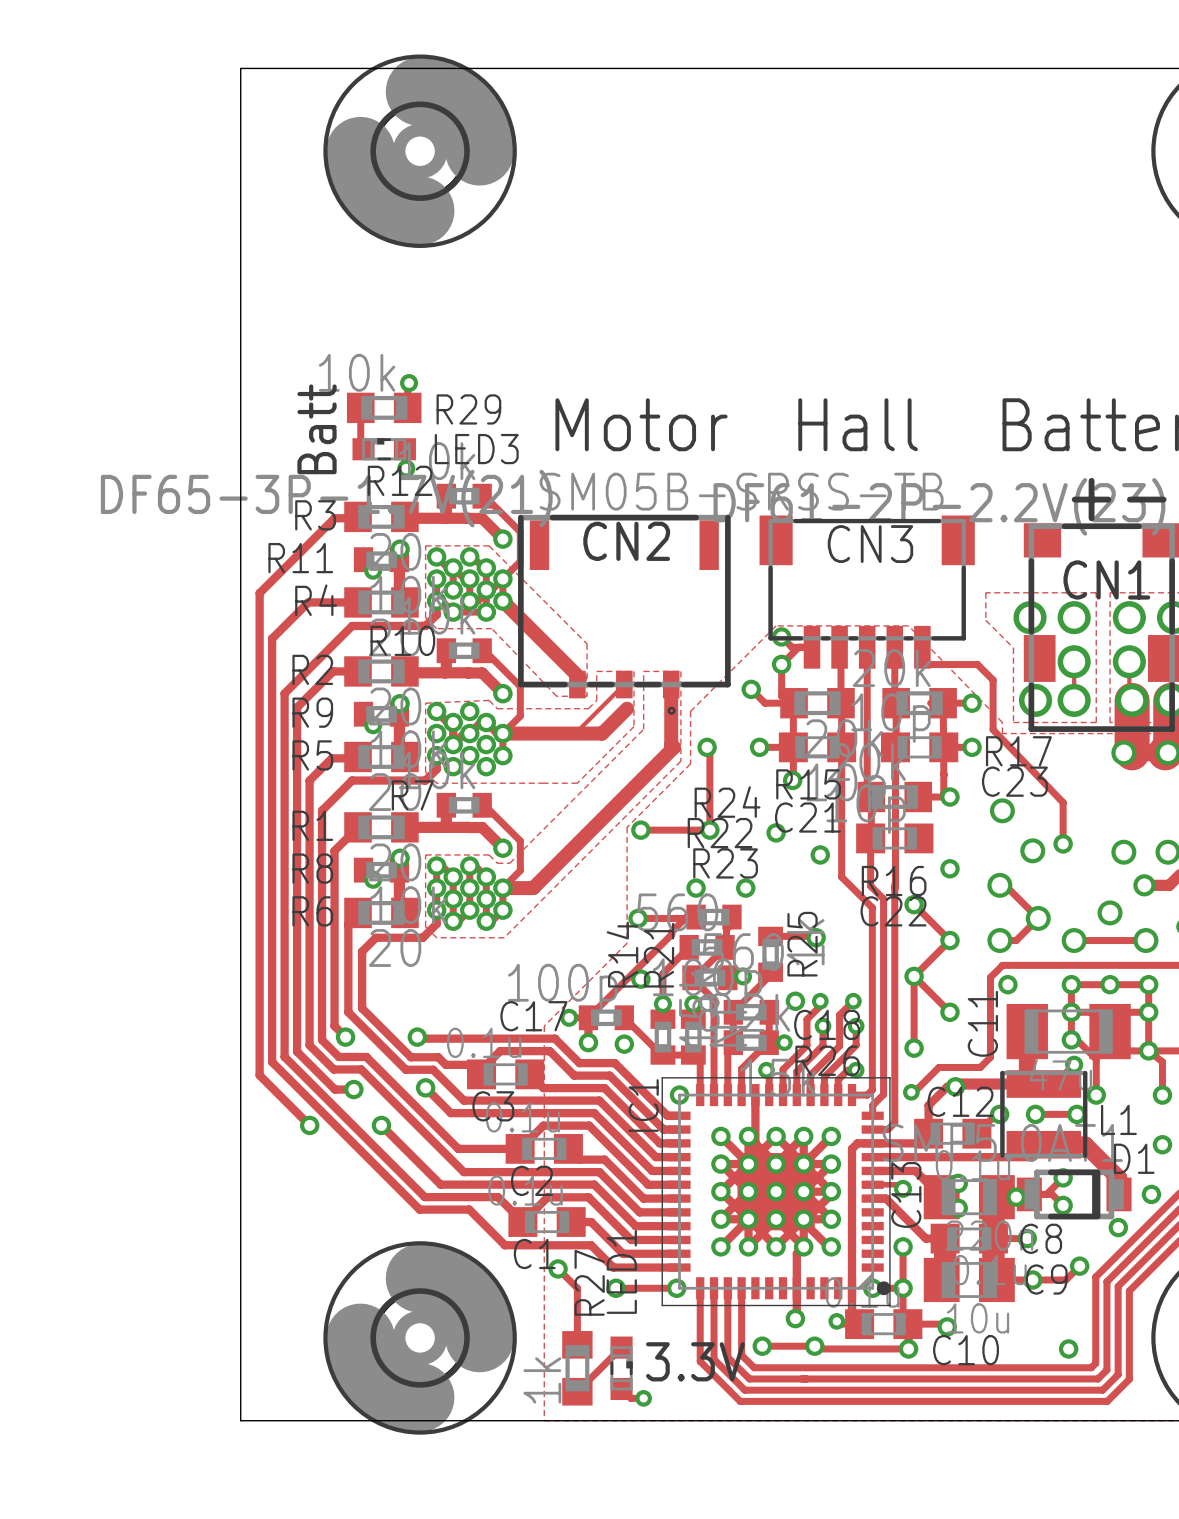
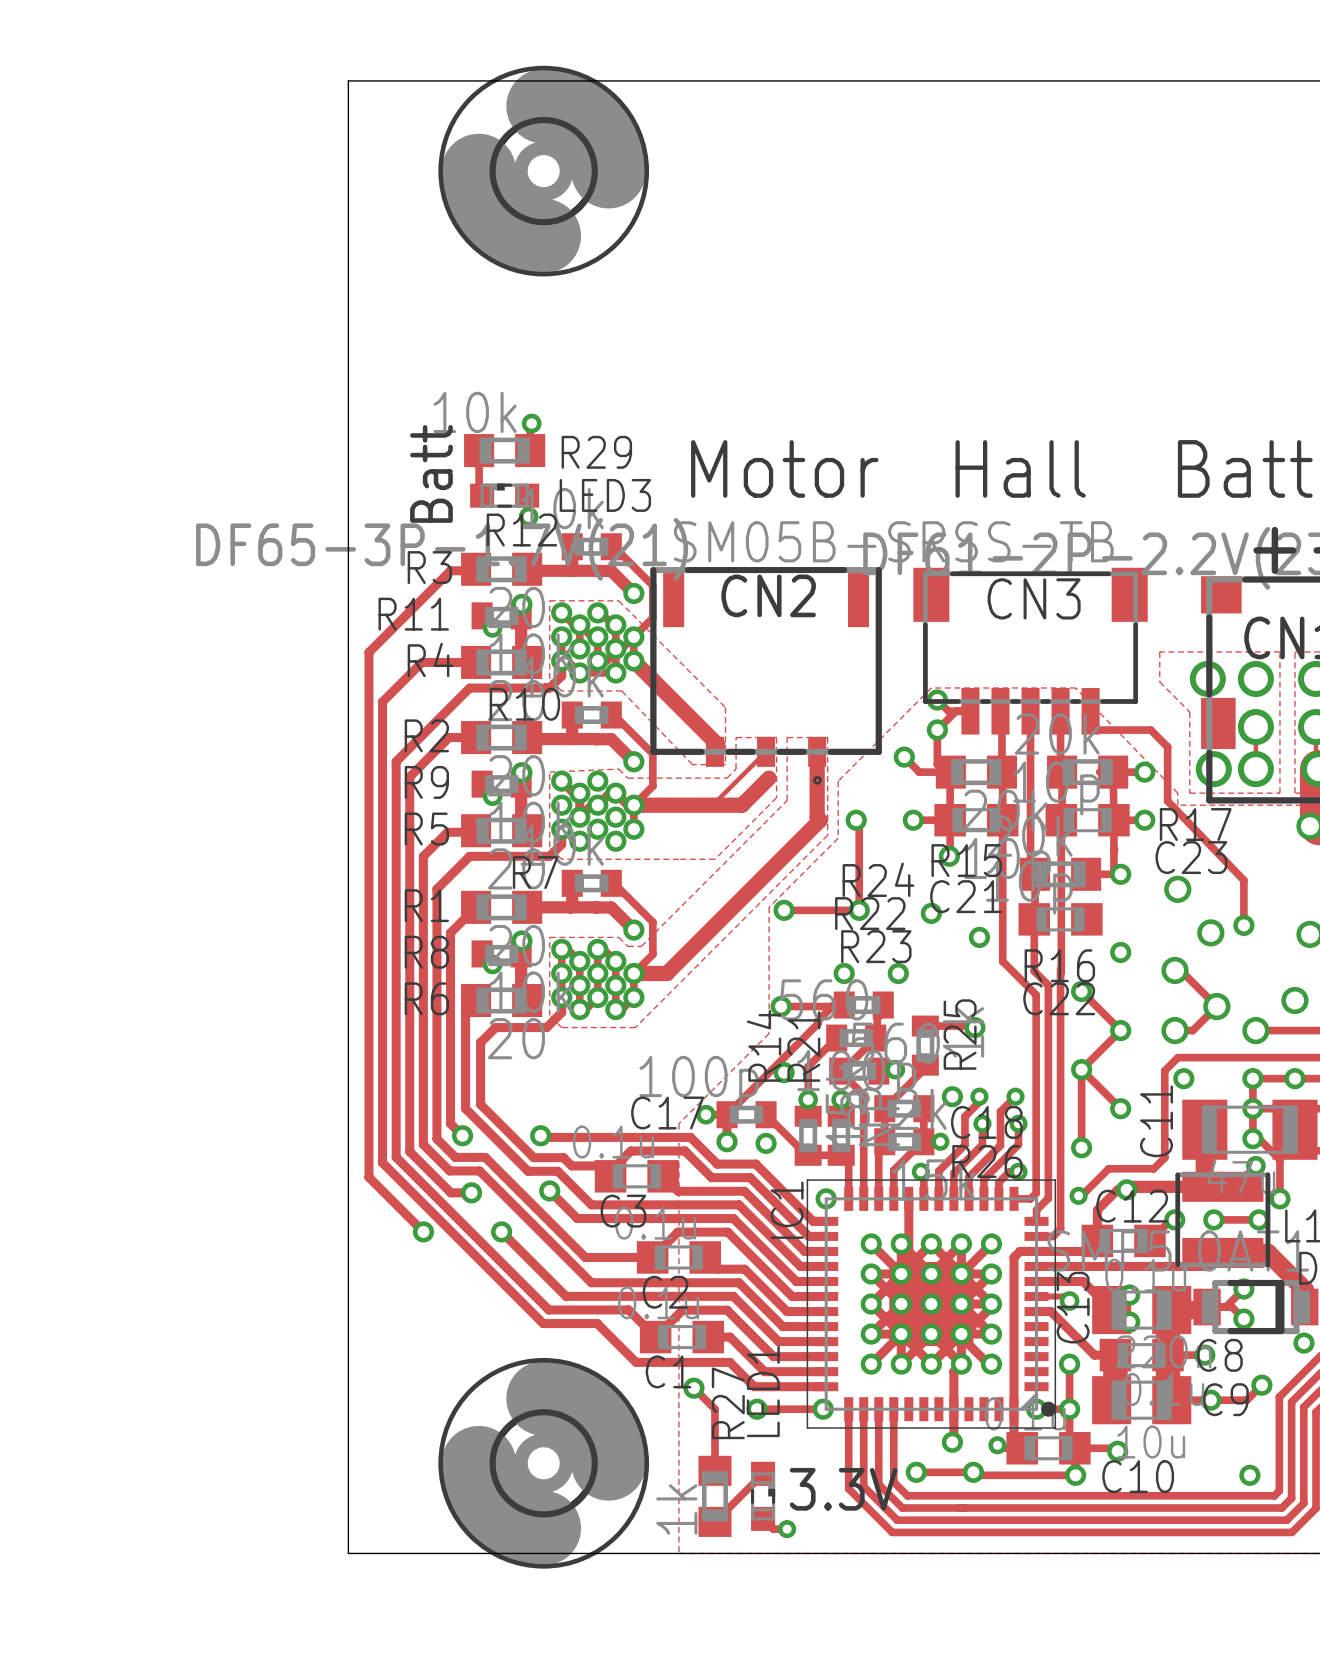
via: (1016, 1197) -> none

